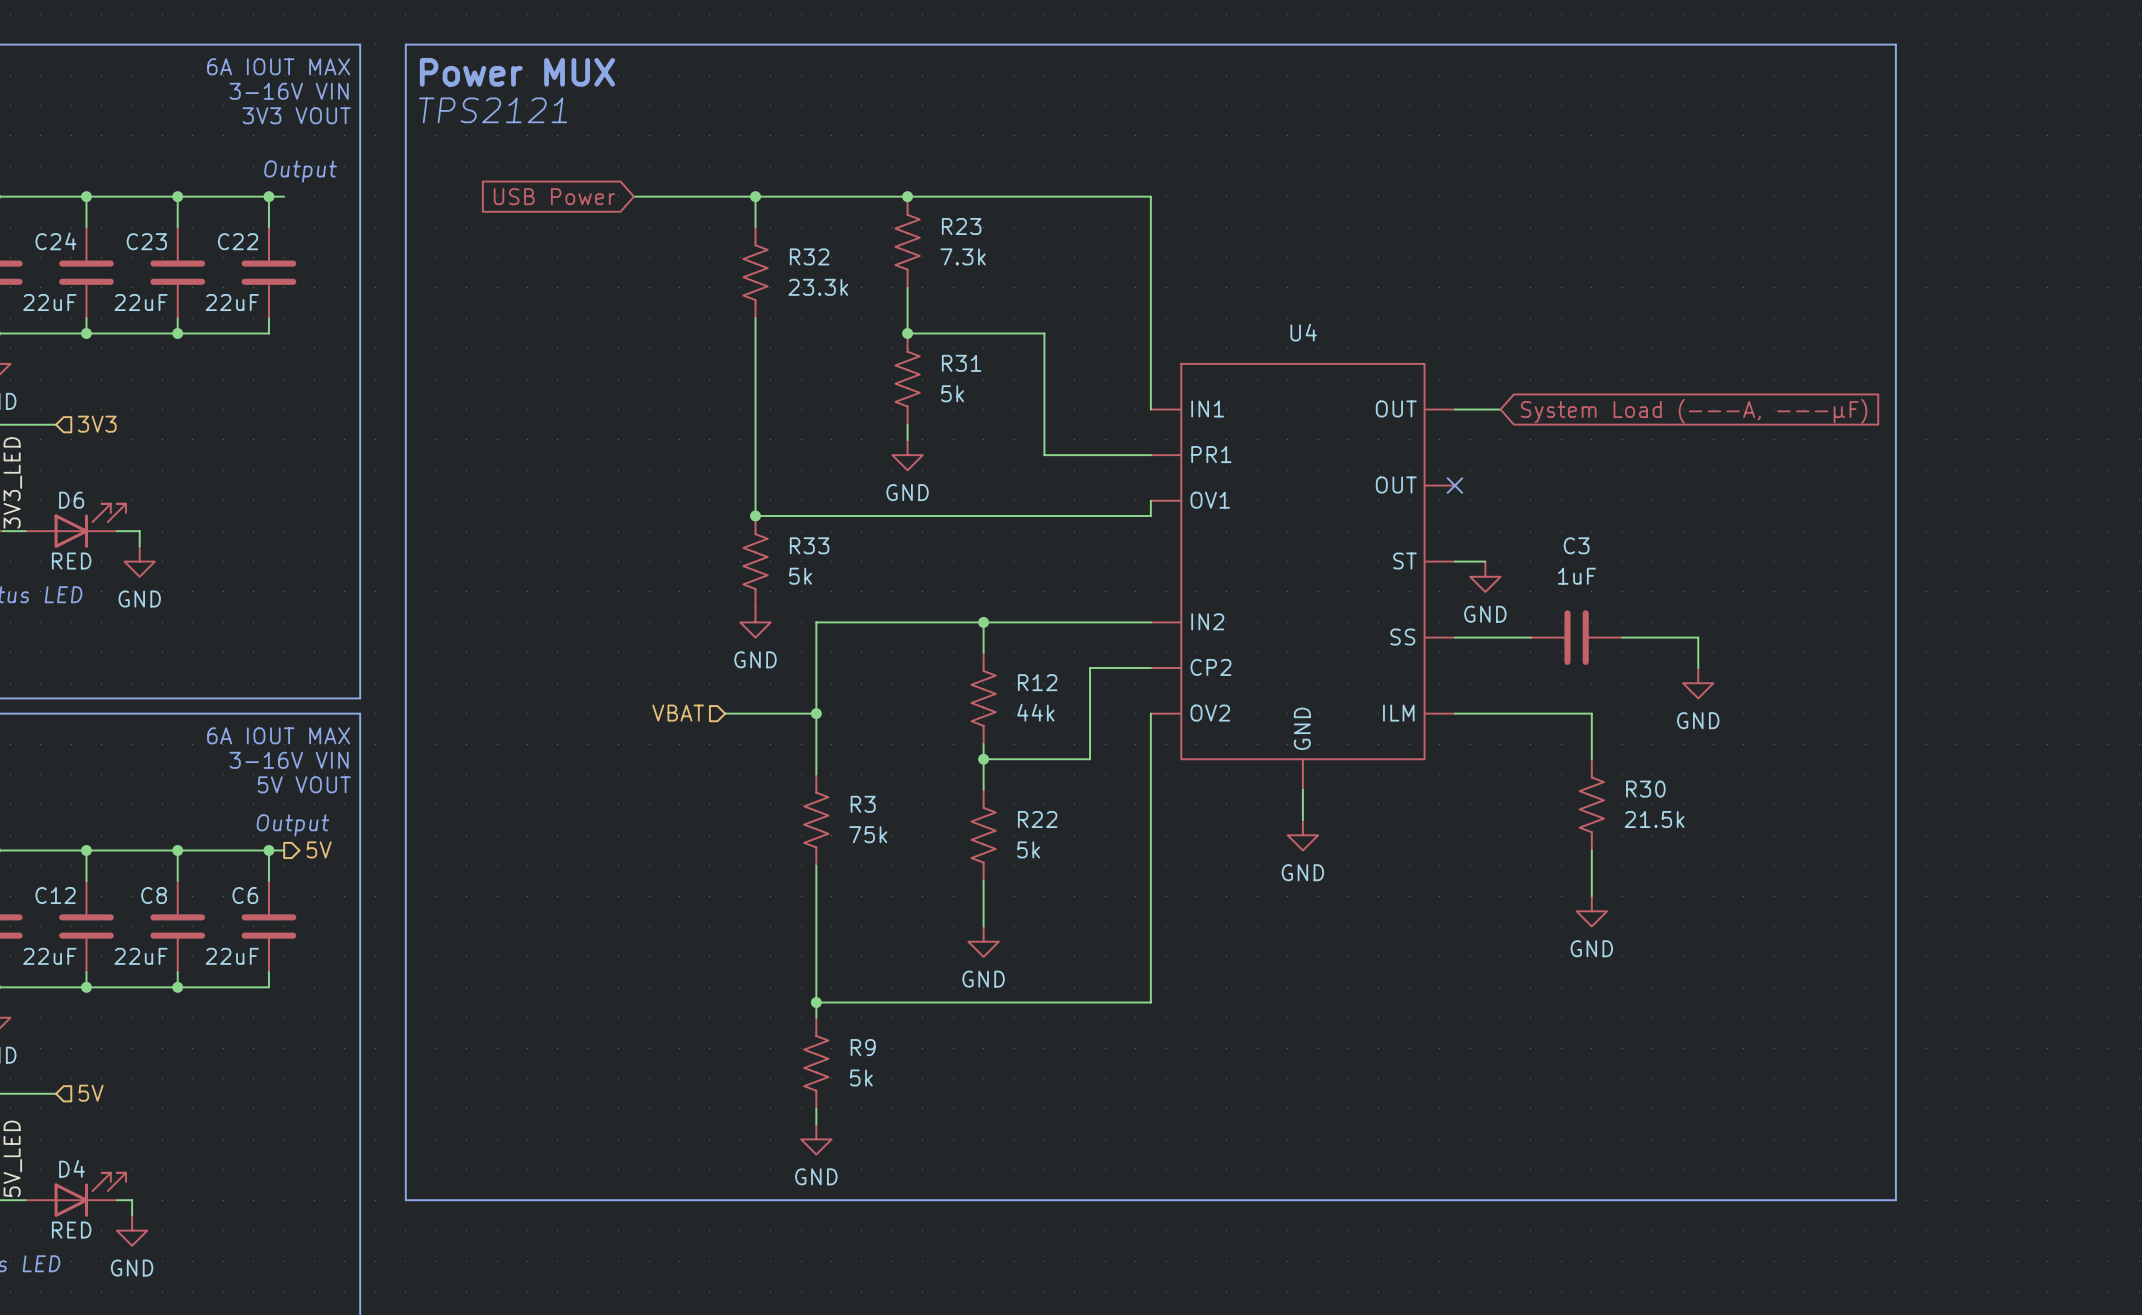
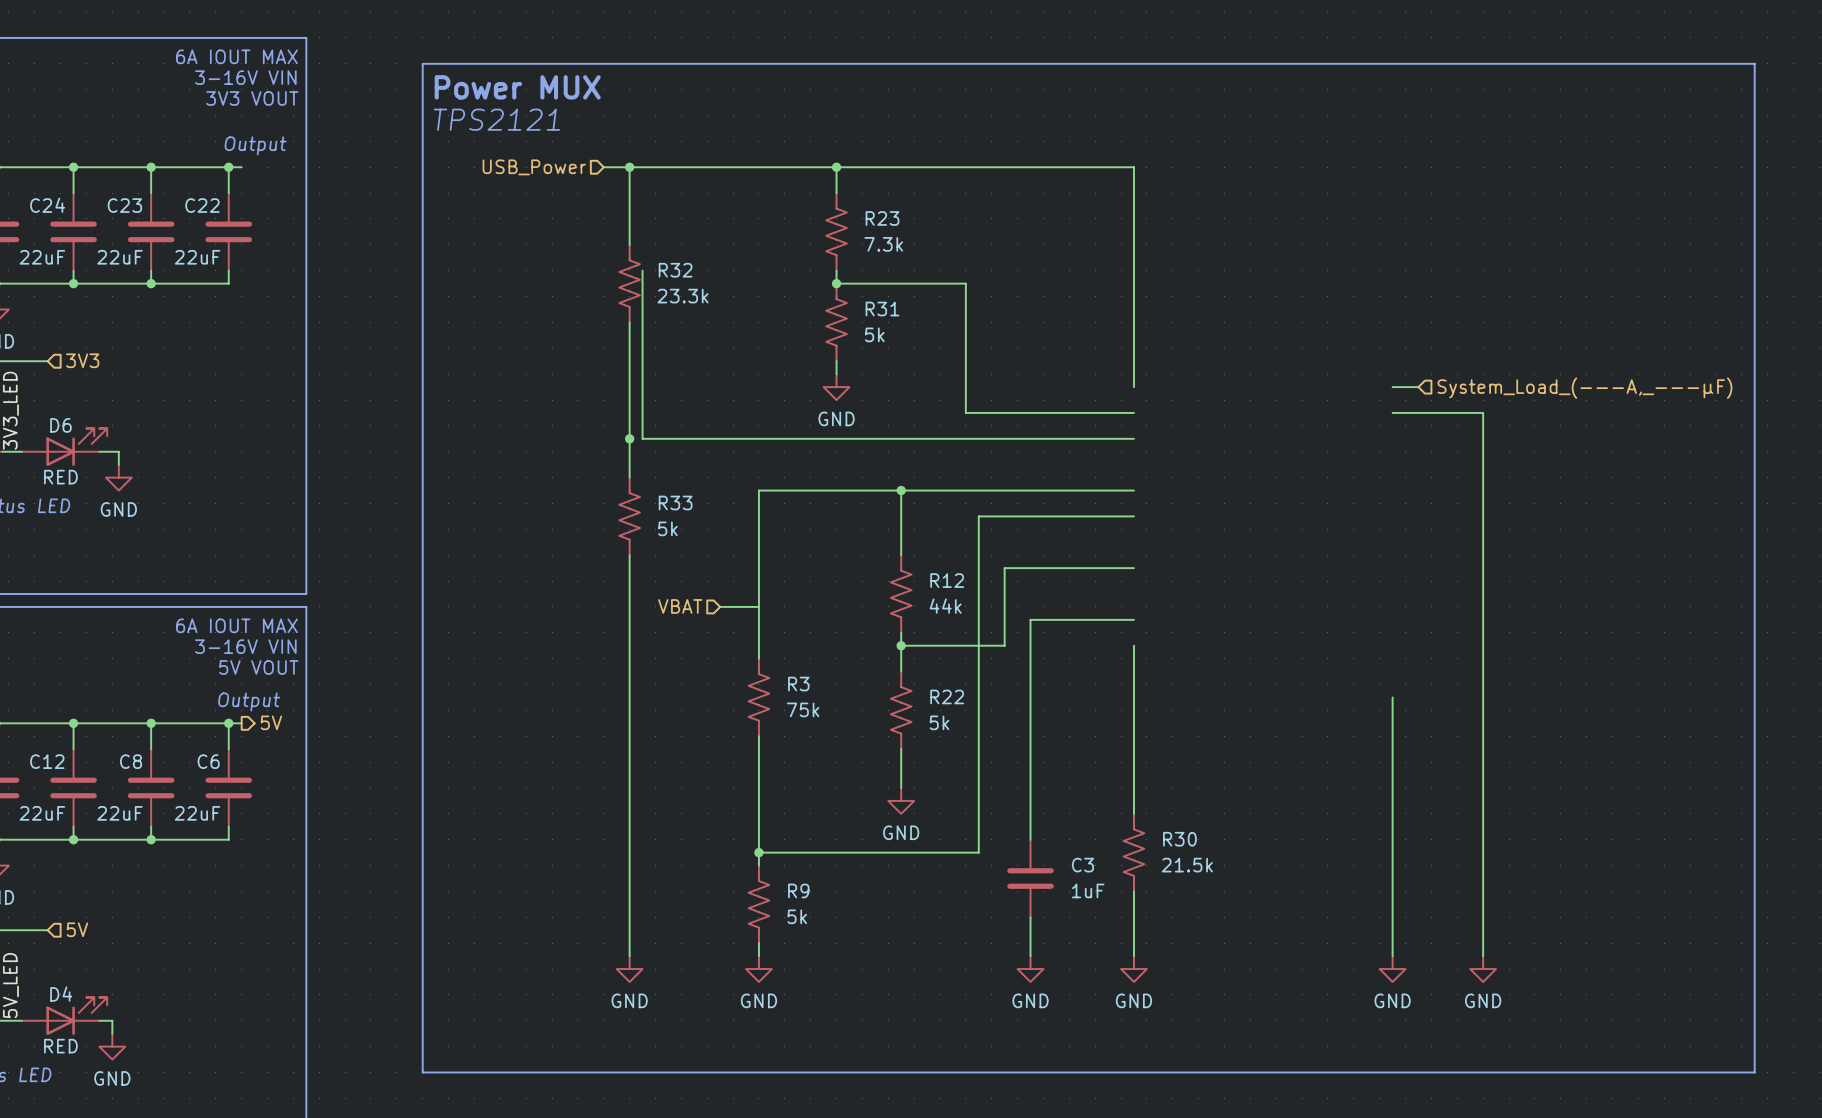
line: (405, 44) (405, 1200) (1895, 1200) (1895, 44) (405, 44) -> (422, 63) (422, 1072) (1754, 1072) (1754, 63) (422, 63)
text position: Power MUX (517, 72) -> Power MUX (517, 87)
text position: TPS2121 (493, 110) -> TPS2121 (496, 119)
global label: USB Power (554, 196) -> none
hierarchical label: none -> USB_Power (534, 167)
wire: (633, 196) (709, 196) -> none
wire: none -> (629, 167) (629, 244)
wire: (755, 196) (755, 227) -> (836, 167) (836, 193)
junction position: (755, 196) -> (629, 167)
junction: (907, 196) -> none
junction: none -> (836, 167)
wire: (1150, 196) (1150, 409) -> (978, 167) (1133, 167) (1133, 387)
R23 position: (907, 242) -> (836, 231)
R32 position: (755, 272) -> (629, 283)
wire: (907, 287) (907, 333) (983, 333) -> (836, 270) (836, 283)
junction: (907, 333) -> none
junction: none -> (836, 283)
wire: (1044, 333) (1044, 455) (1150, 455) -> (888, 283) (965, 283) (965, 412) (1133, 412)
wire: none -> (629, 322) (629, 477)
R31 position: (907, 379) -> (836, 322)
wire: (1454, 409) (1500, 409) -> none
global label: System Load (---A, ---μF) (1694, 411) -> none
wire: (907, 424) (907, 439) -> (836, 361) (836, 374)
power symbol position: GND (907, 455) -> GND (836, 387)
hierarchical label: none -> System_Load_(---A,_---μF) (1584, 388)
no-connect mark: (1454, 485) -> none
wire: none -> (1392, 412) (1483, 412) (1483, 956)
wire: (1150, 500) (1150, 515) -> (1133, 438) (978, 438)
junction position: (755, 515) -> (629, 438)
C3 name position: C3 (1576, 545) -> C3 (1082, 865)
R33 position: (755, 561) -> (629, 516)
wire: (1454, 561) (1485, 561) -> (1392, 387) (1418, 387)
wire: none -> (901, 490) (901, 555)
junction: none -> (901, 490)
U4: (1302, 576) -> none
wire: none -> (1133, 490) (758, 490) (758, 658)
power symbol: GND (1485, 576) -> none
wire: none -> (1133, 516) (978, 516) (978, 606)
power symbol: GND (755, 622) -> none
wire: (983, 622) (983, 652) -> none
junction: (983, 622) -> none
wire: (1150, 622) (816, 622) (816, 774) -> none
wire: (1454, 637) (1530, 637) -> none
C3 rotation: 0° (1576, 637) -> 90° clockwise (1030, 878)
C3 position: (1576, 637) -> (1030, 878)
wire: (1622, 637) (1698, 637) (1698, 668) -> none
wire: none -> (629, 555) (629, 956)
wire: (1150, 668) (1090, 668) (1090, 759) -> (1133, 568) (1004, 568) (1004, 645) (927, 645)
power symbol: GND (1698, 683) -> none
R12 position: (983, 698) -> (901, 594)
hierarchical label position: VBAT (678, 713) -> VBAT (680, 606)
wire: (725, 713) (816, 713) -> none
junction: (816, 713) -> none
wire: none -> (720, 606) (758, 606)
wire: (1454, 713) (1591, 713) (1591, 759) -> none
wire: none -> (1133, 619) (1030, 619) (1030, 839)
wire: (983, 744) (983, 789) -> (901, 632) (901, 671)
wire: (983, 759) (1059, 759) -> none
junction: (983, 759) -> none
junction: none -> (901, 645)
wire: none -> (1133, 645) (1133, 813)
wire: (1302, 789) (1302, 820) -> none
R30 position: (1591, 804) -> (1133, 852)
R3 position: (816, 820) -> (758, 697)
wire: none -> (1392, 697) (1392, 956)
R22 position: (983, 835) -> (901, 710)
power symbol: GND (1302, 835) -> none
wire: (1591, 850) (1591, 896) -> none
wire: (816, 865) (816, 1017) -> (758, 736) (758, 865)
wire: (983, 880) (983, 926) -> (901, 749) (901, 787)
power symbol: GND (1591, 911) -> none
power symbol position: GND (983, 941) -> GND (901, 800)
wire: (816, 1002) (892, 1002) -> none
junction: (816, 1002) -> none
junction: none -> (758, 852)
wire: none -> (1133, 891) (1133, 956)
R9 position: (816, 1063) -> (758, 904)
wire: none -> (1030, 917) (1030, 956)
wire: (816, 1108) (816, 1124) -> (758, 943) (758, 956)
power symbol: none -> GND (629, 969)
power symbol: GND (816, 1139) -> none
power symbol: none -> GND (758, 969)
power symbol: none -> GND (1030, 969)
power symbol: none -> GND (1133, 969)
power symbol: none -> GND (1392, 969)
power symbol: none -> GND (1483, 969)

